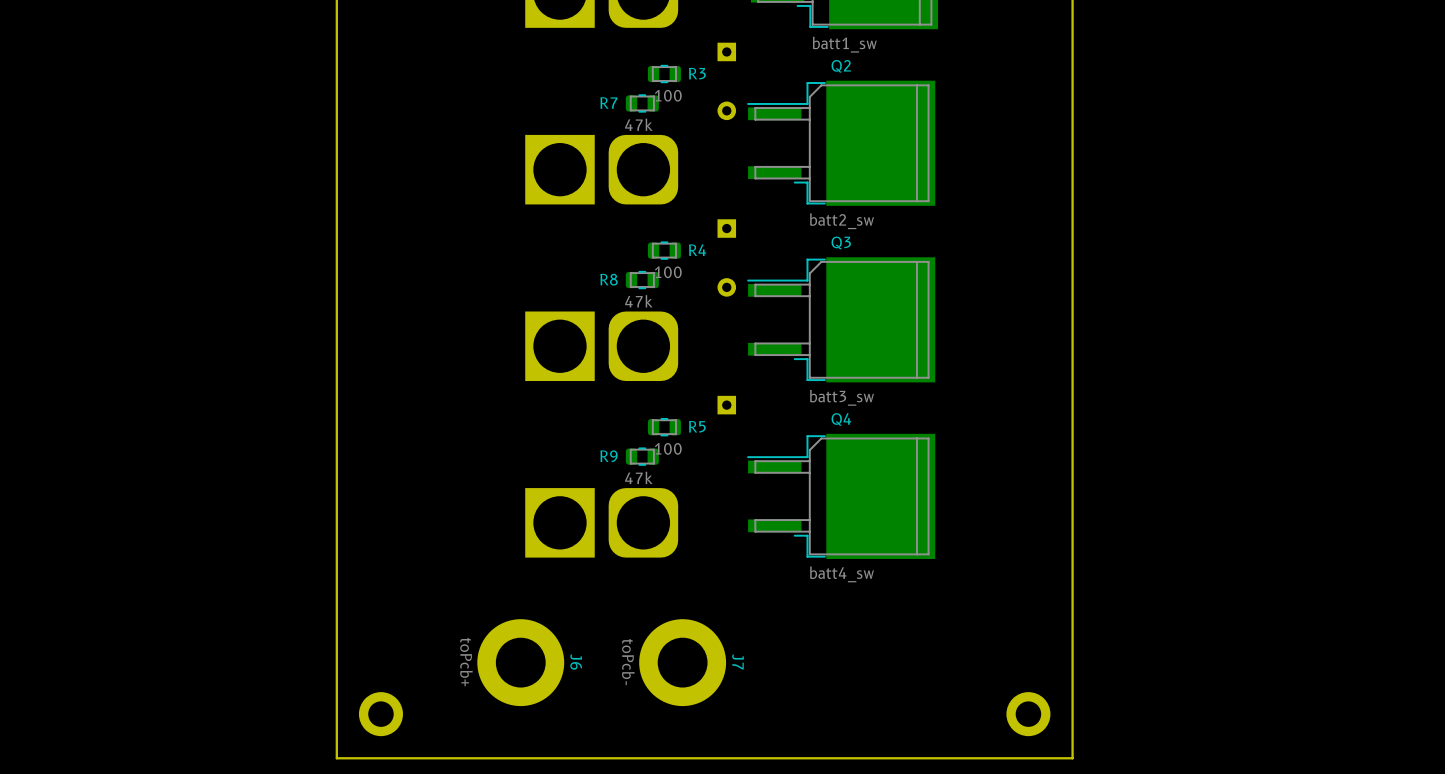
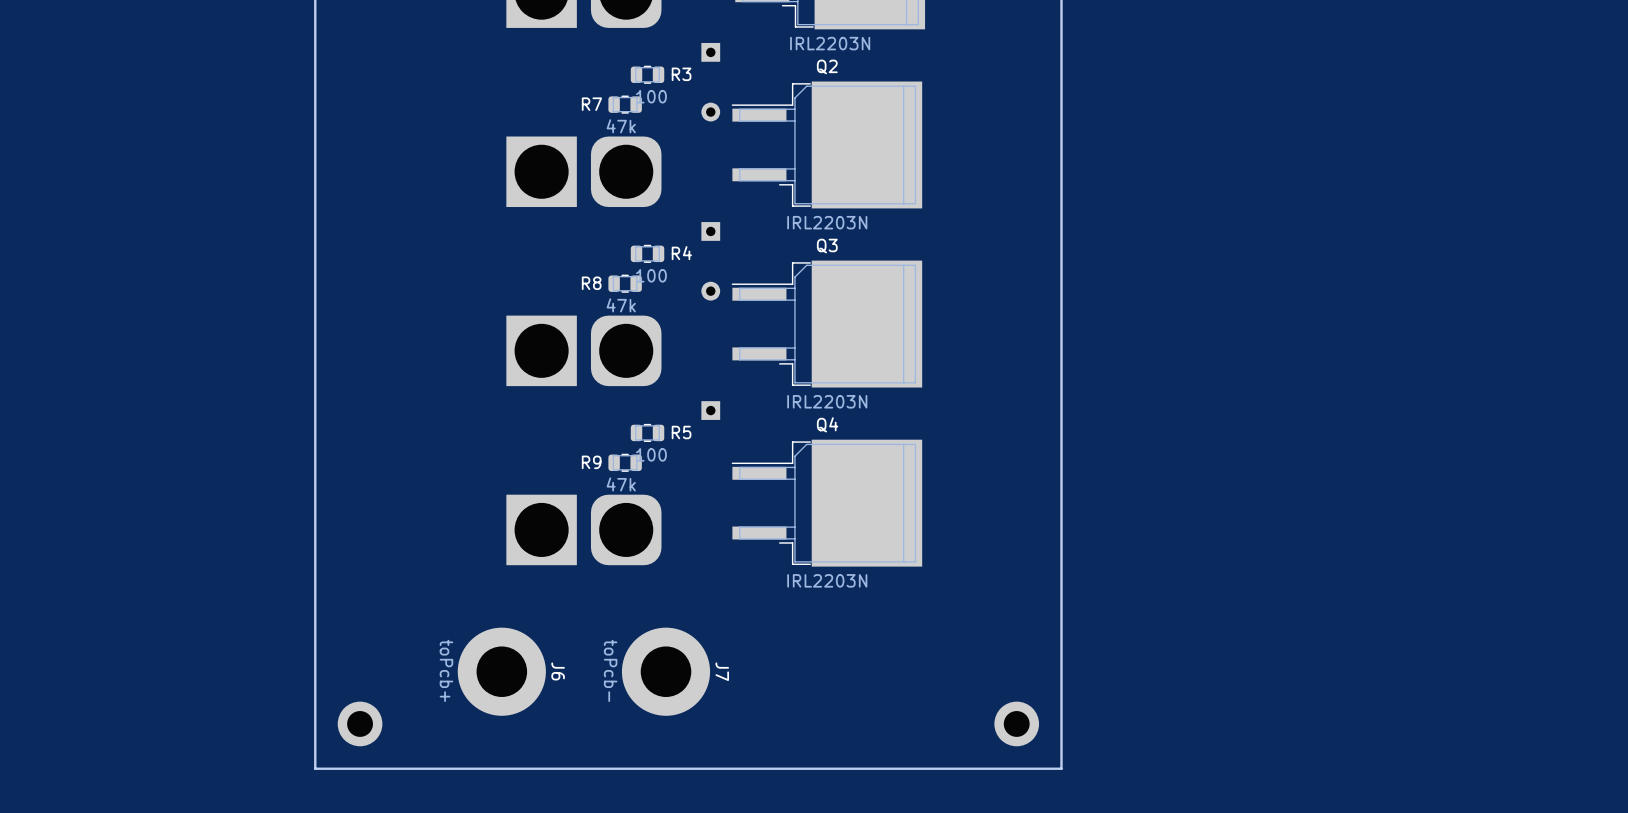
part value: batt1_sw (844, 44) -> IRL2203N (830, 43)
Q2 value: batt2_sw (842, 221) -> IRL2203N (827, 222)
Q3 value: batt3_sw (842, 397) -> IRL2203N (827, 401)
Q4 value: batt4_sw (842, 574) -> IRL2203N (827, 580)

